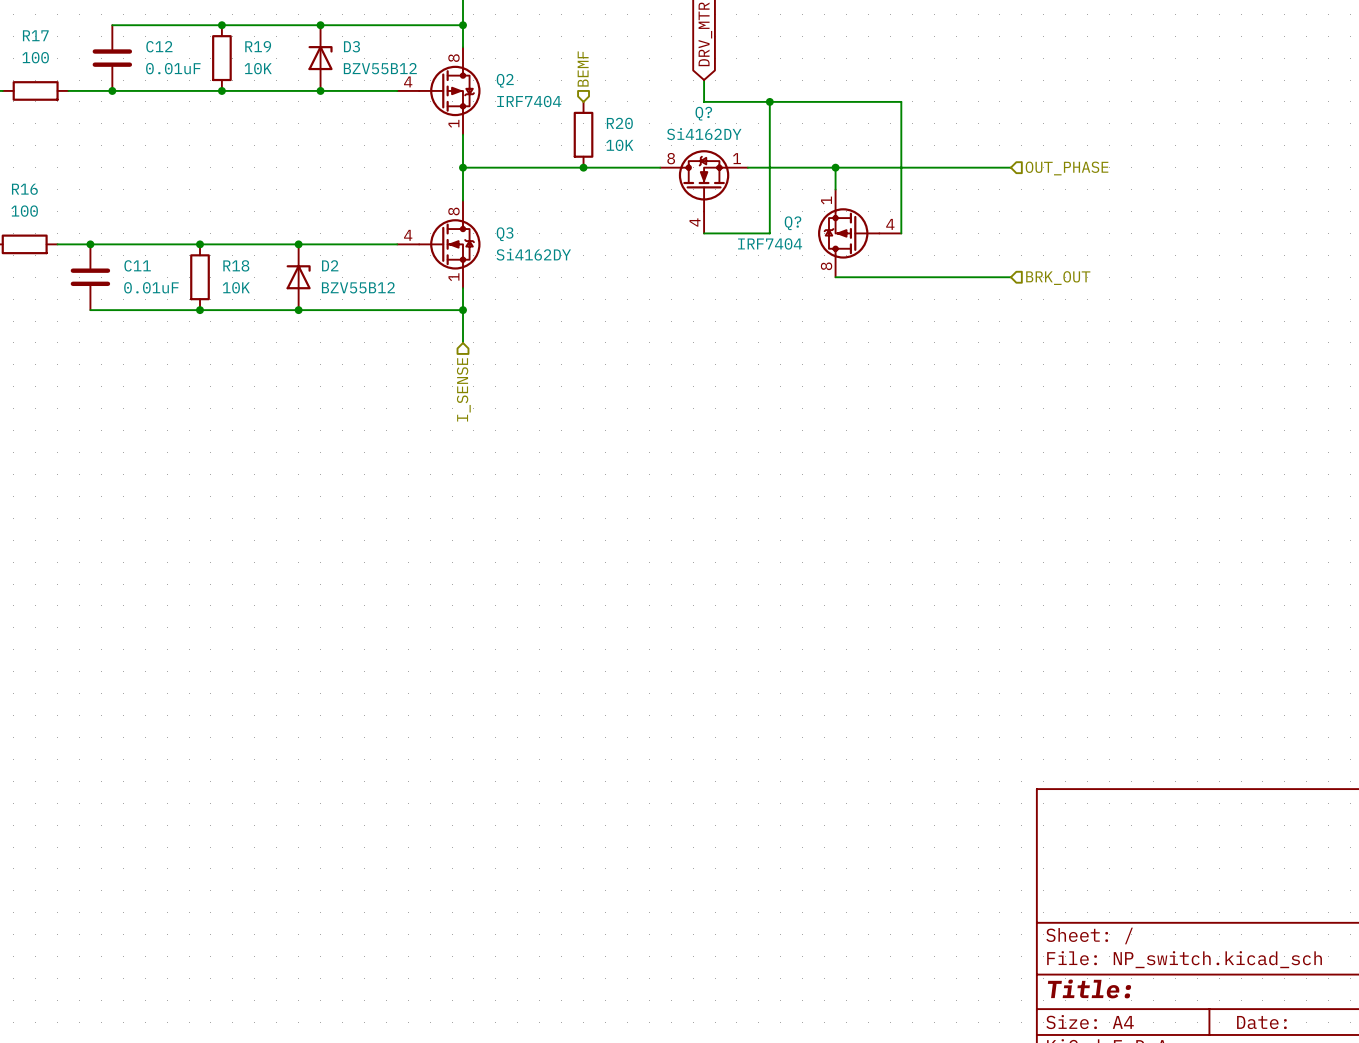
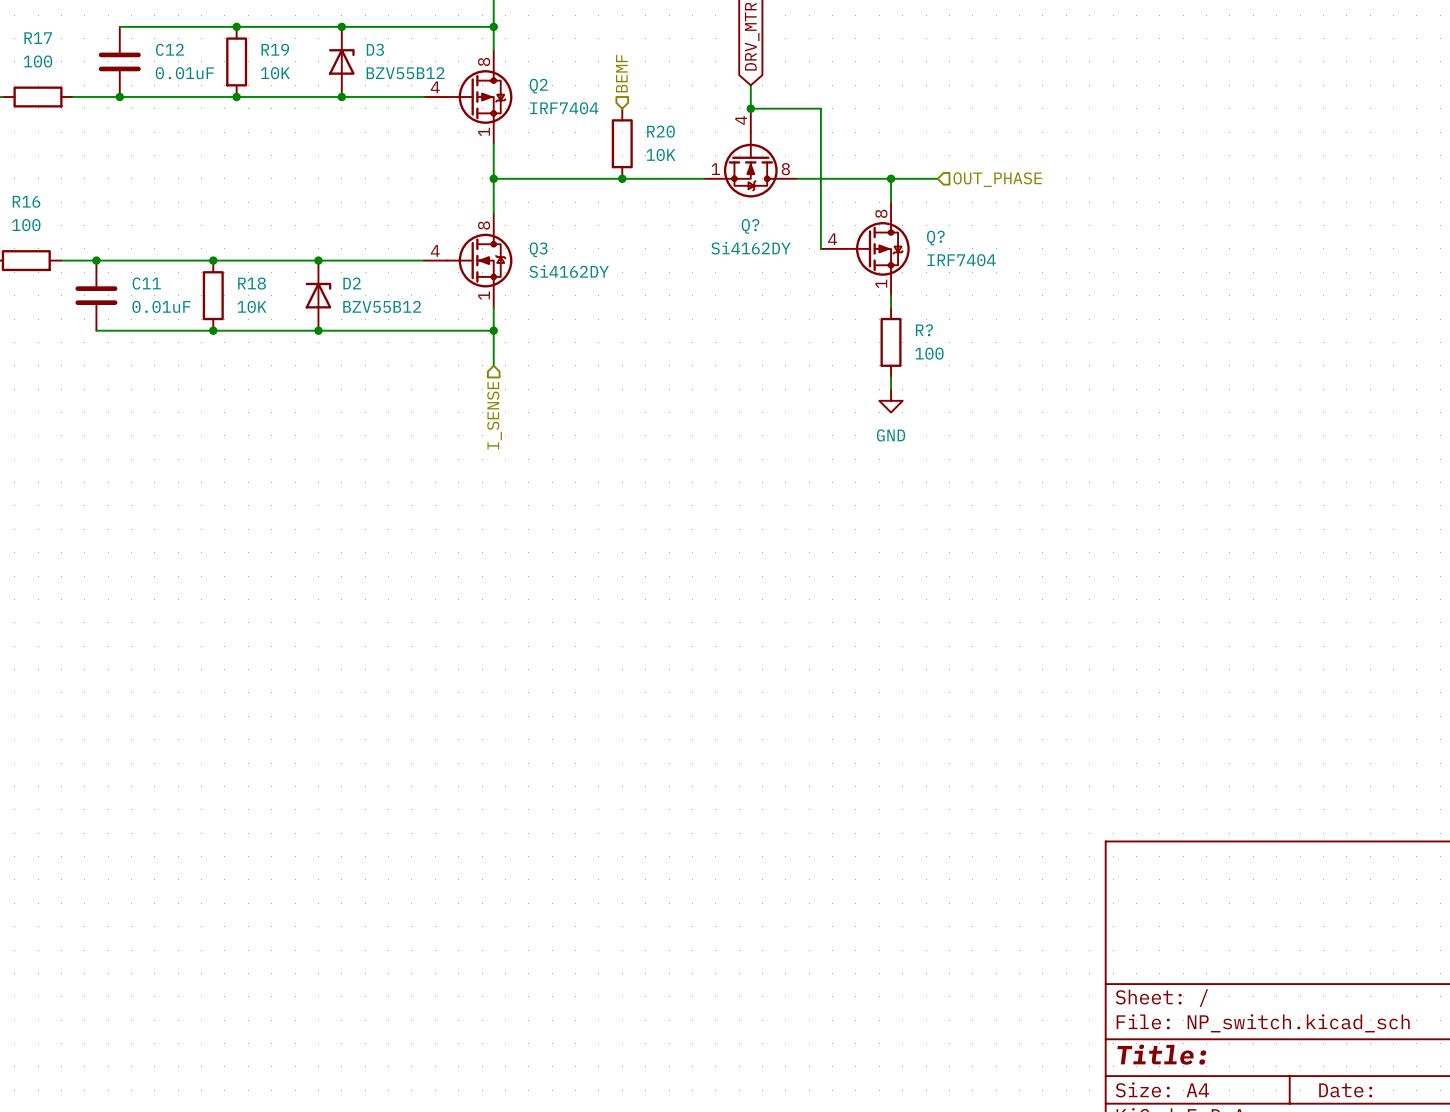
junction: none -> (750, 108)
wire: (769, 101) (901, 101) (901, 233) -> none
junction: (769, 101) -> none
Q? value position: Si4162DY (704, 134) -> Si4162DY (751, 248)
wire: (879, 167) (1010, 167) -> none
hierarchical label position: OUT_PHASE (1067, 168) -> OUT_PHASE (997, 179)
Q? rotation: 0° (704, 180) -> 180° (750, 164)
Q? name position: Q? (793, 223) -> Q? (935, 238)
wire: (704, 233) (769, 233) -> none
Q? rotation: 0° (848, 233) -> 180° (877, 248)
Q? value position: IRF7404 (770, 243) -> IRF7404 (961, 260)
wire: (835, 277) (1010, 277) -> (891, 295) (891, 307)
hierarchical label: BRK_OUT (1058, 278) -> none
R?: none -> 100 (891, 342)
wire: none -> (891, 377) (891, 389)
power symbol: none -> GND (891, 400)

